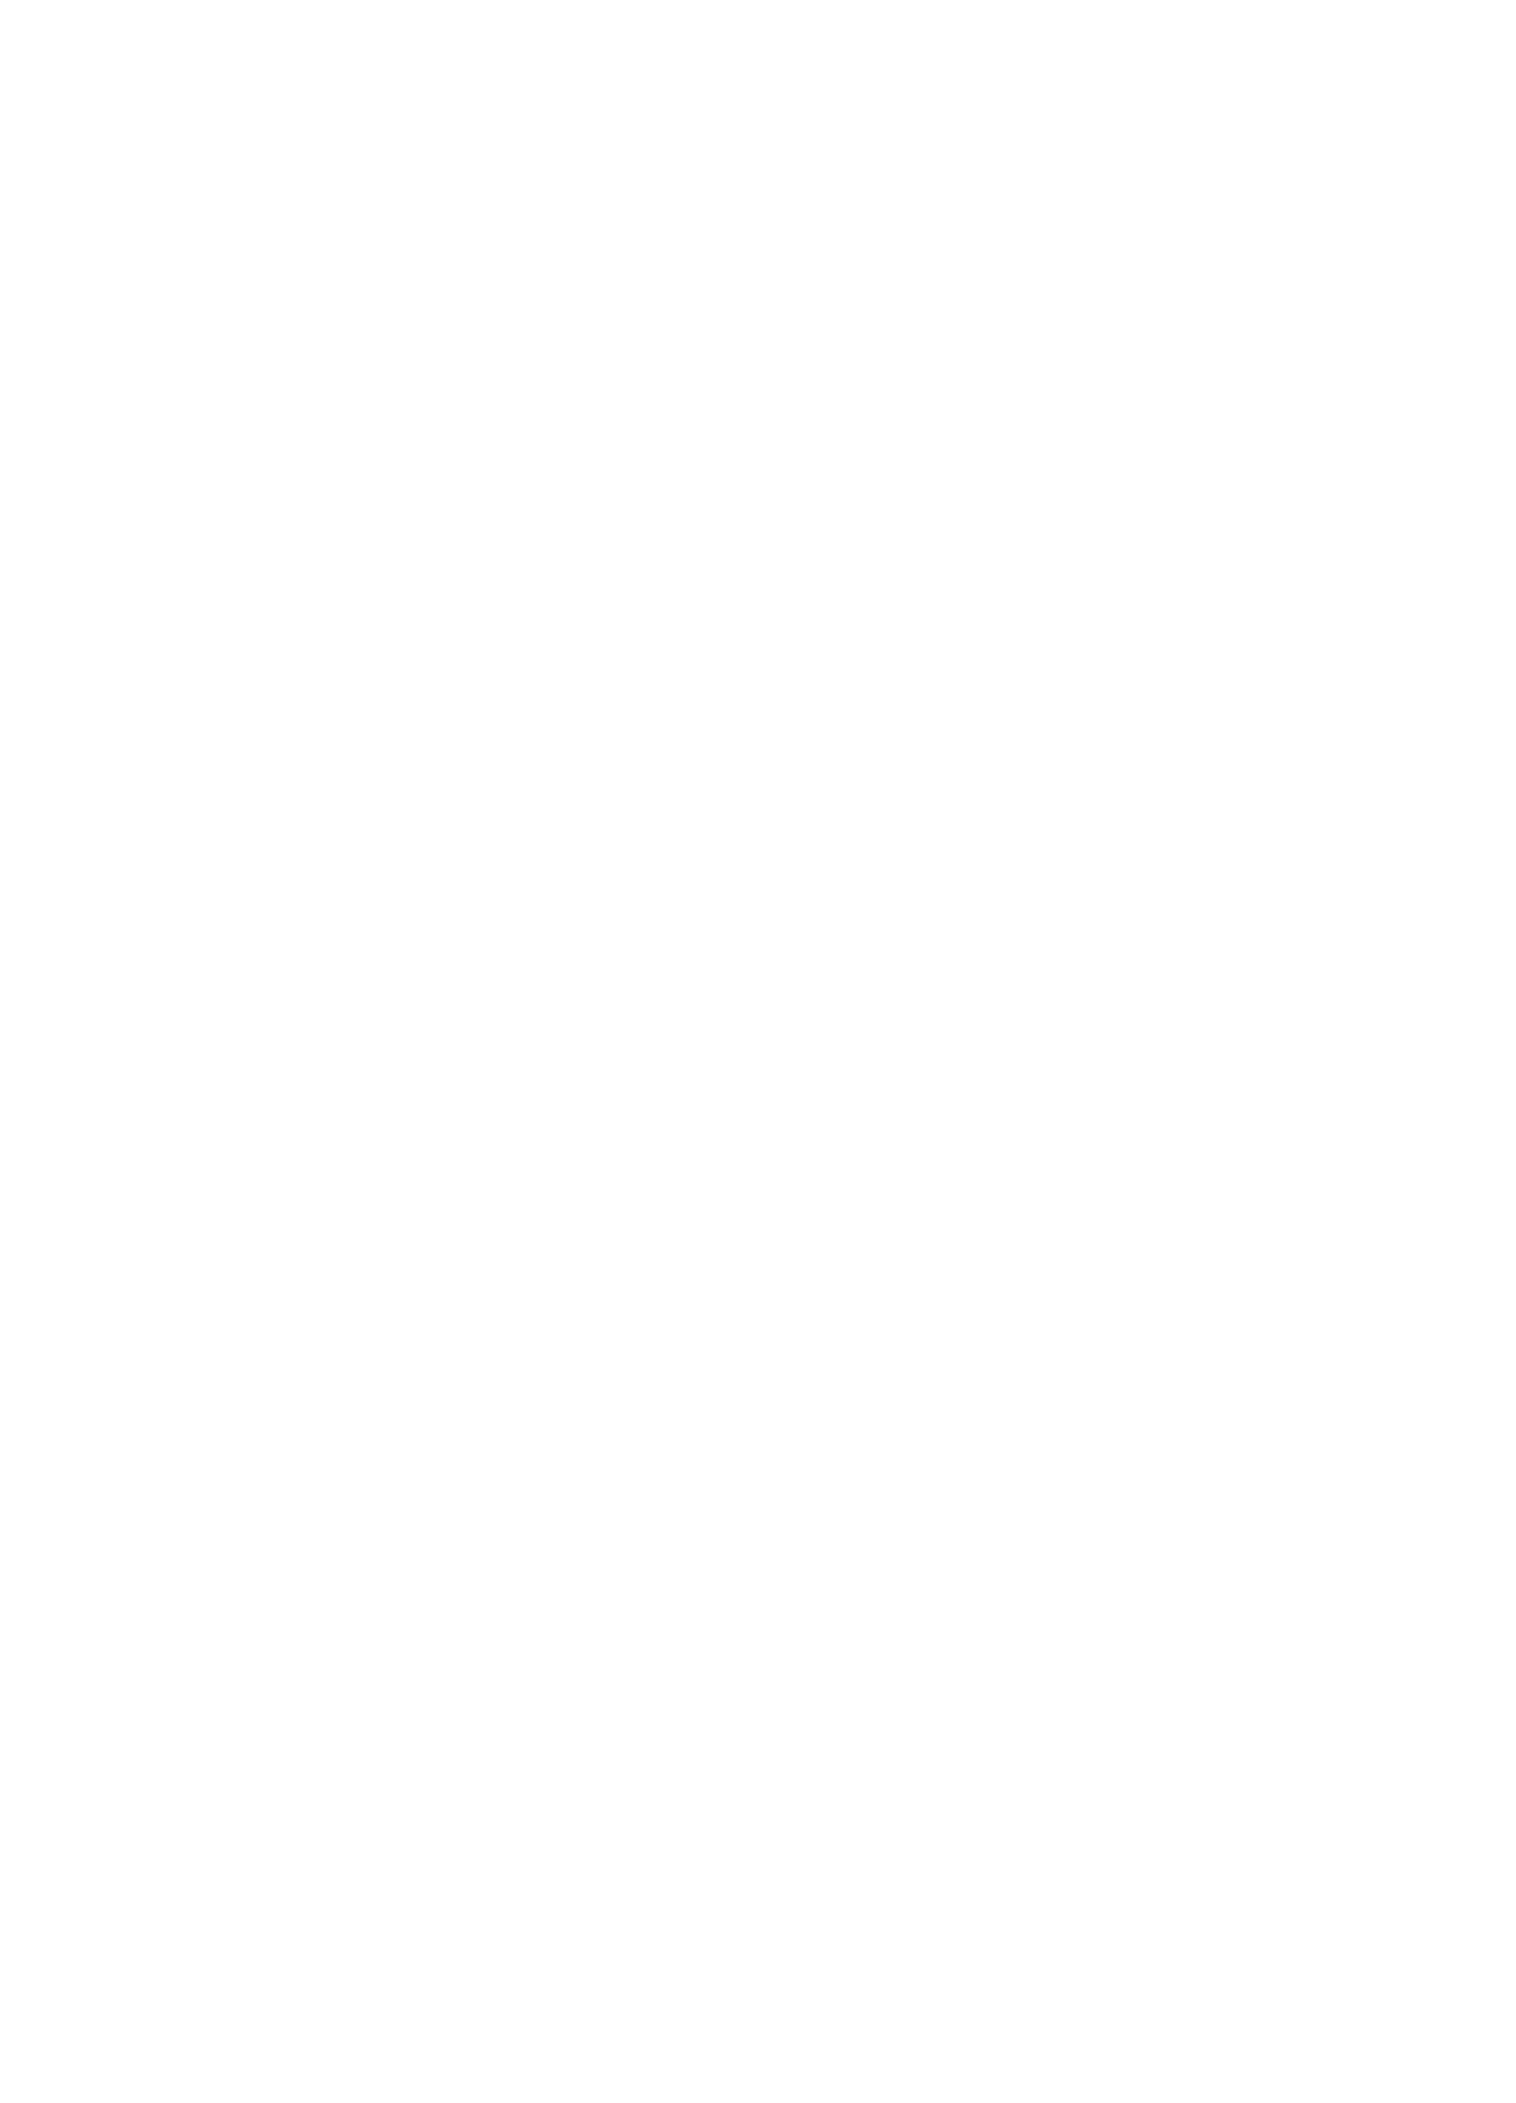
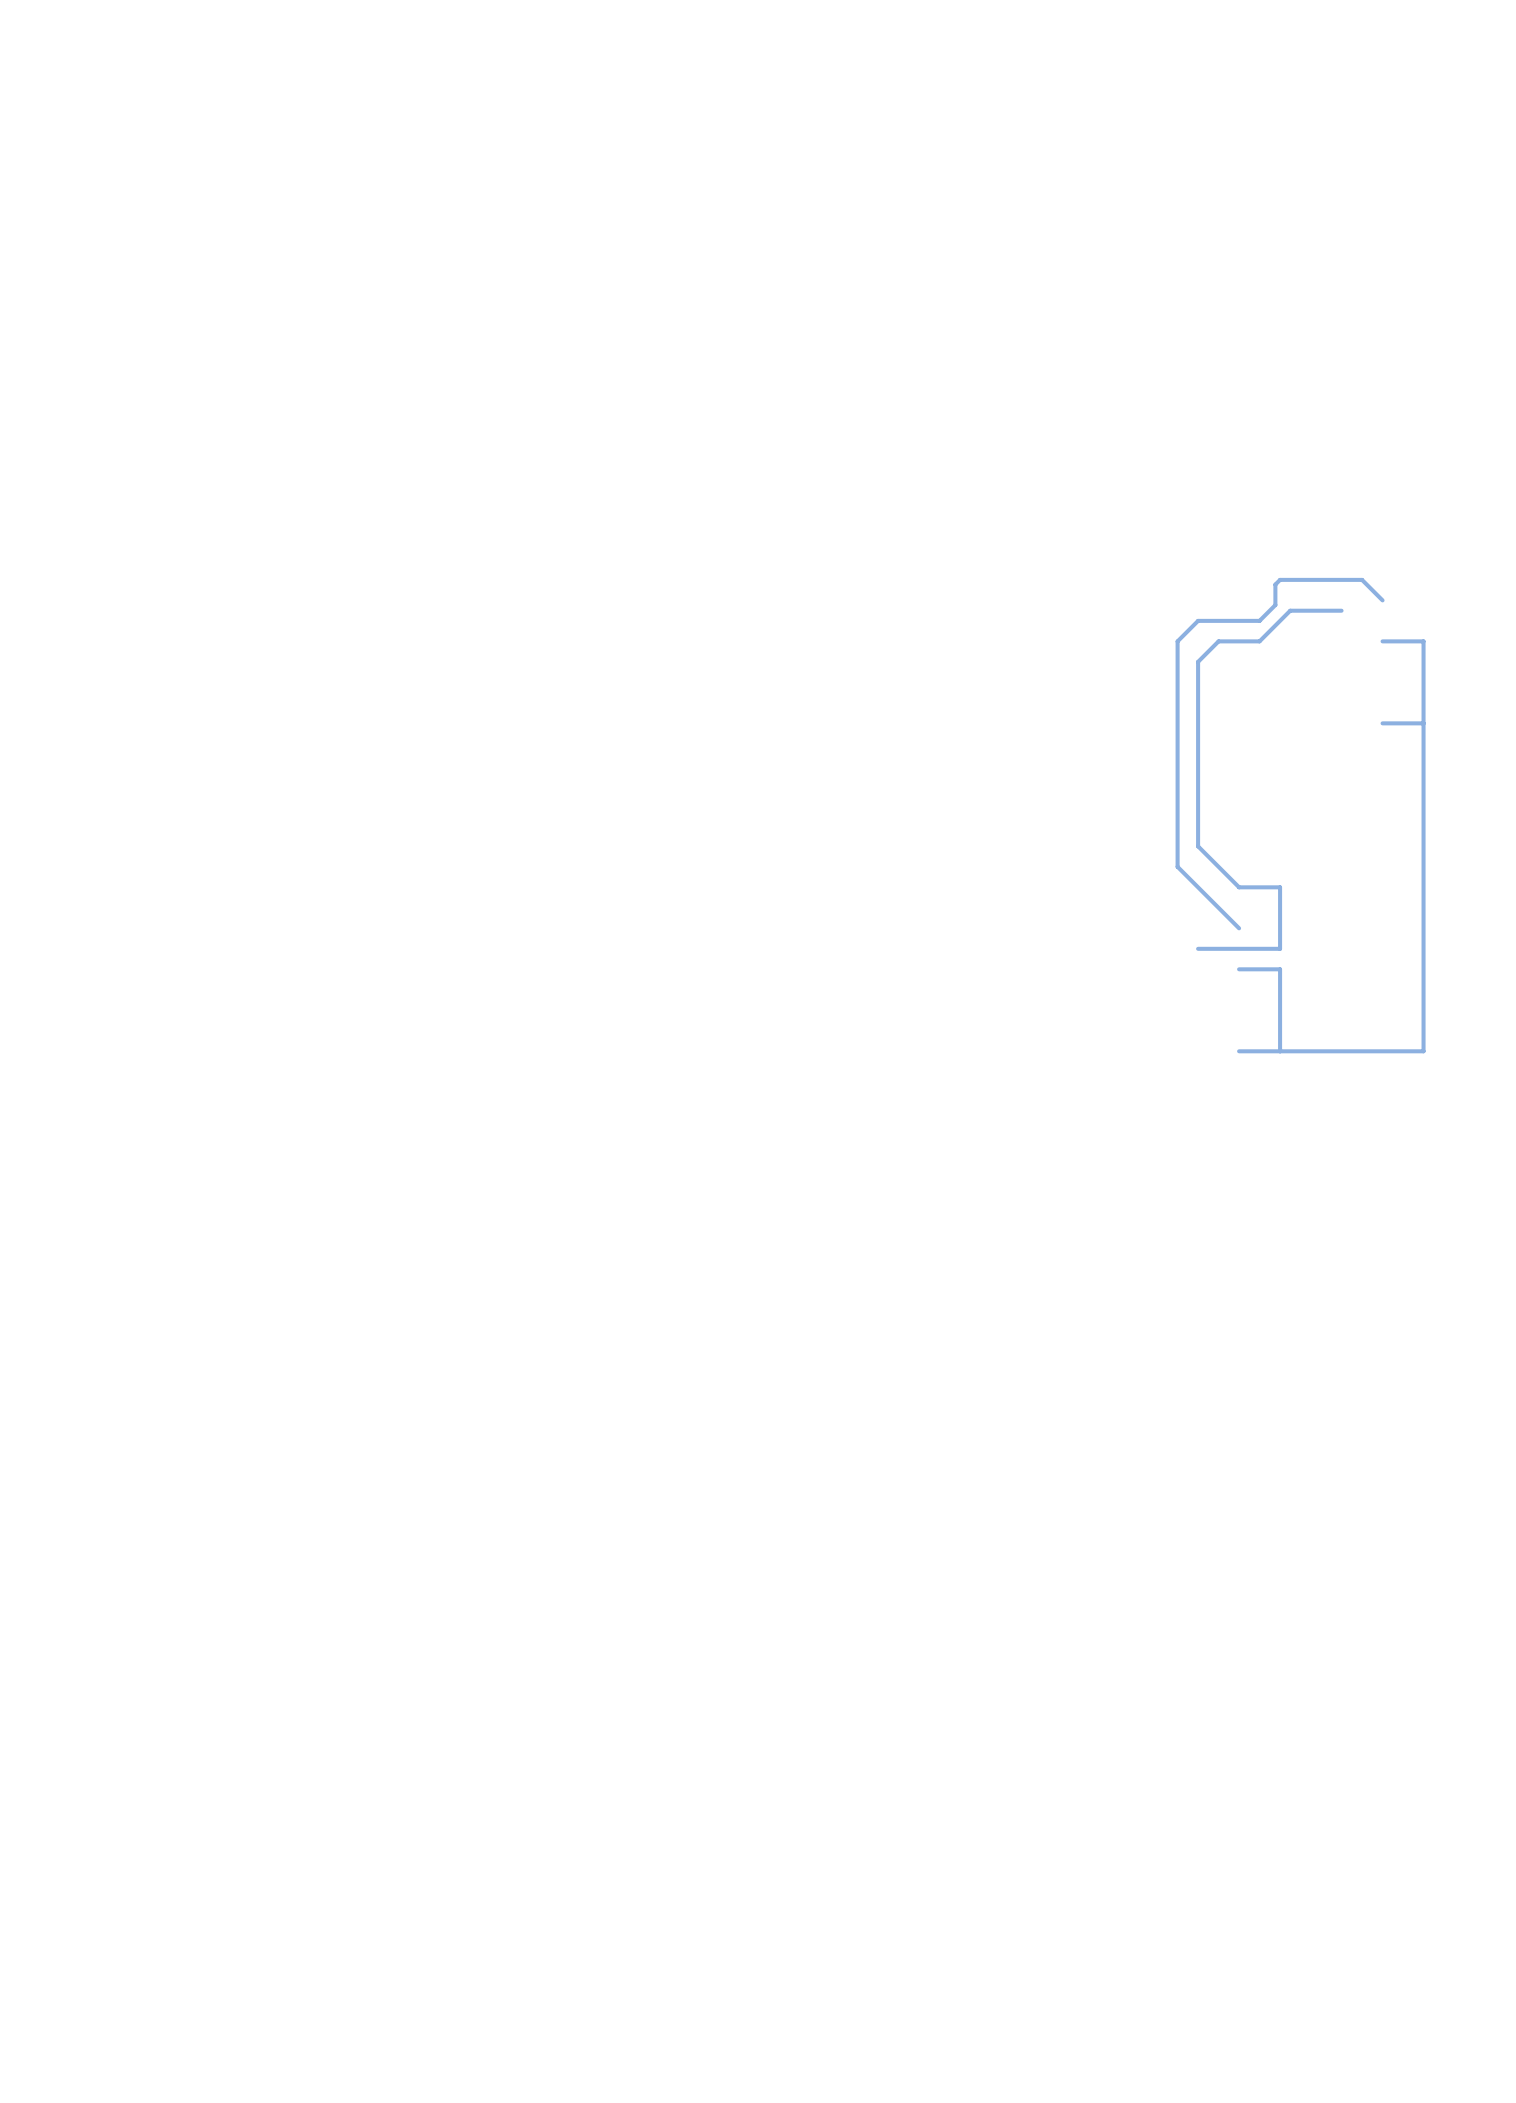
track: none -> (1382, 600) (1362, 579) (1280, 579) (1275, 584) (1275, 605) (1259, 620) (1198, 620) (1177, 641) (1177, 866) (1239, 928)
track: none -> (1341, 610) (1290, 610) (1259, 641) (1218, 641) (1198, 661) (1198, 846) (1239, 887) (1280, 887) (1280, 948) (1198, 948)
track: none -> (1382, 641) (1423, 641) (1423, 1051) (1239, 1051)
track: none -> (1423, 723) (1382, 723)
track: none -> (1239, 969) (1280, 969) (1280, 1051)

